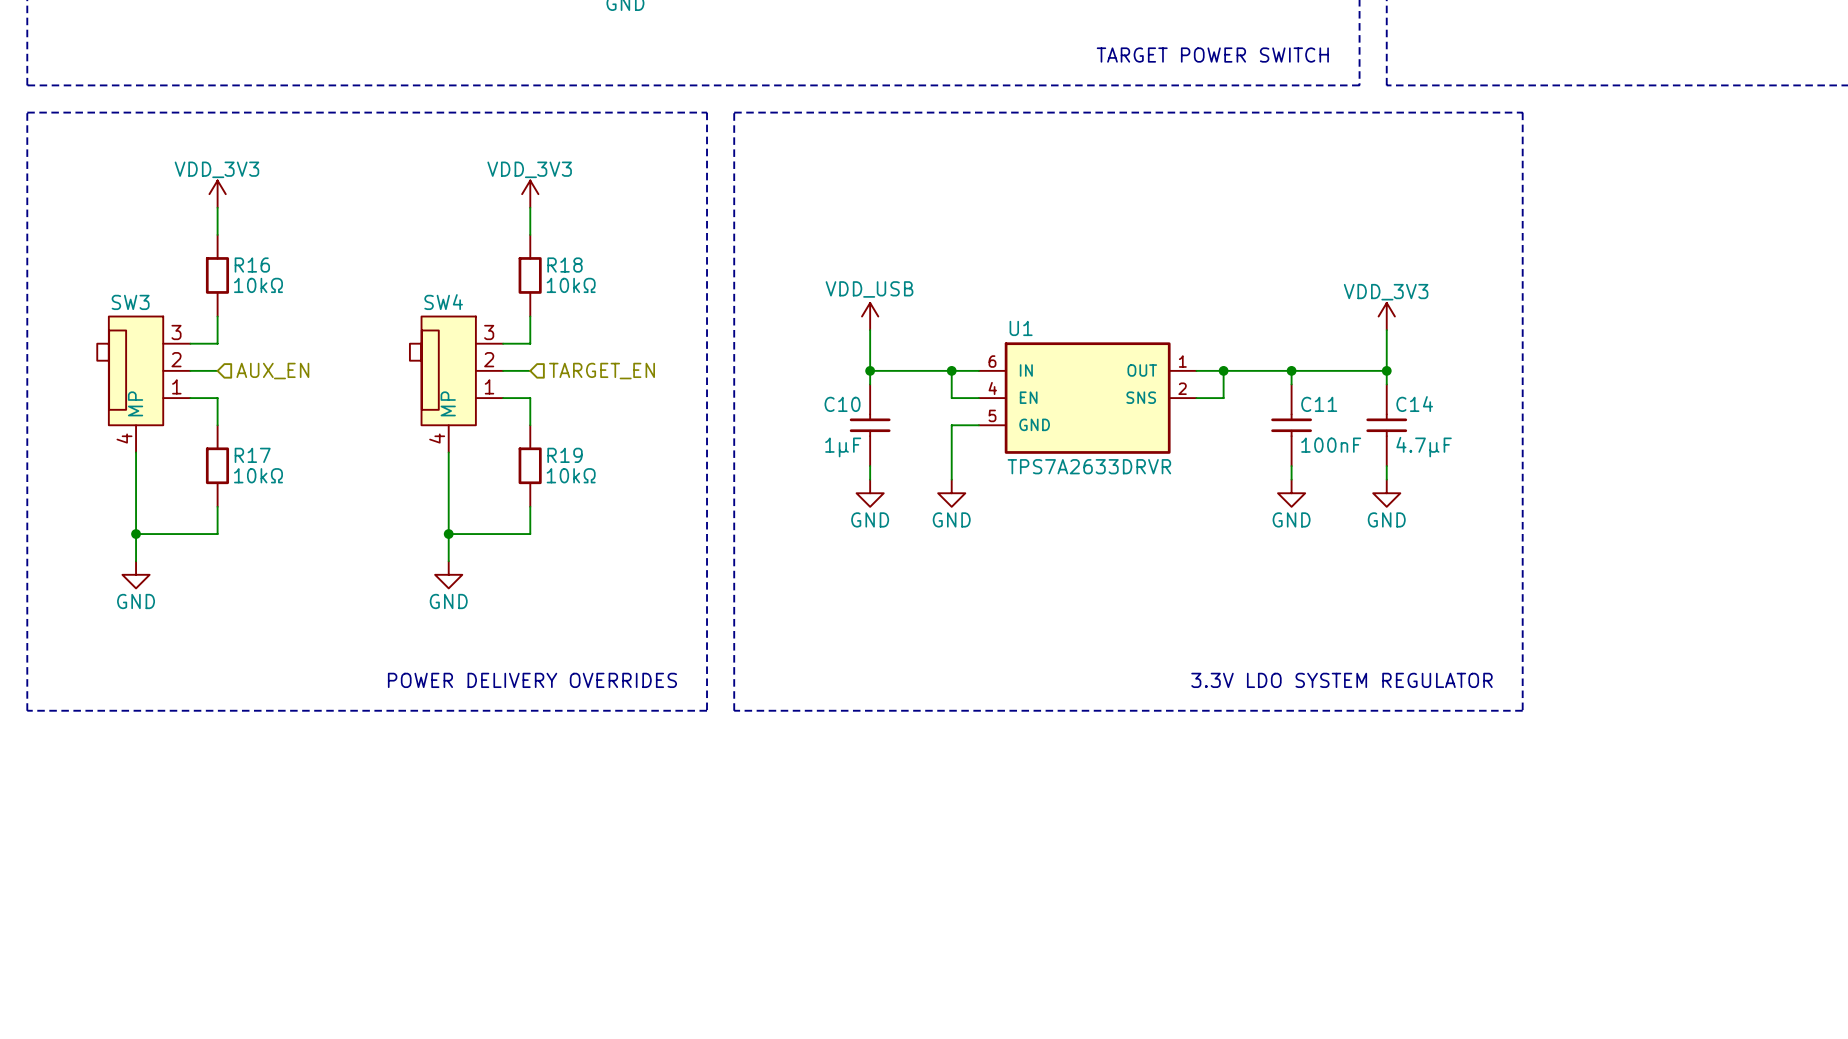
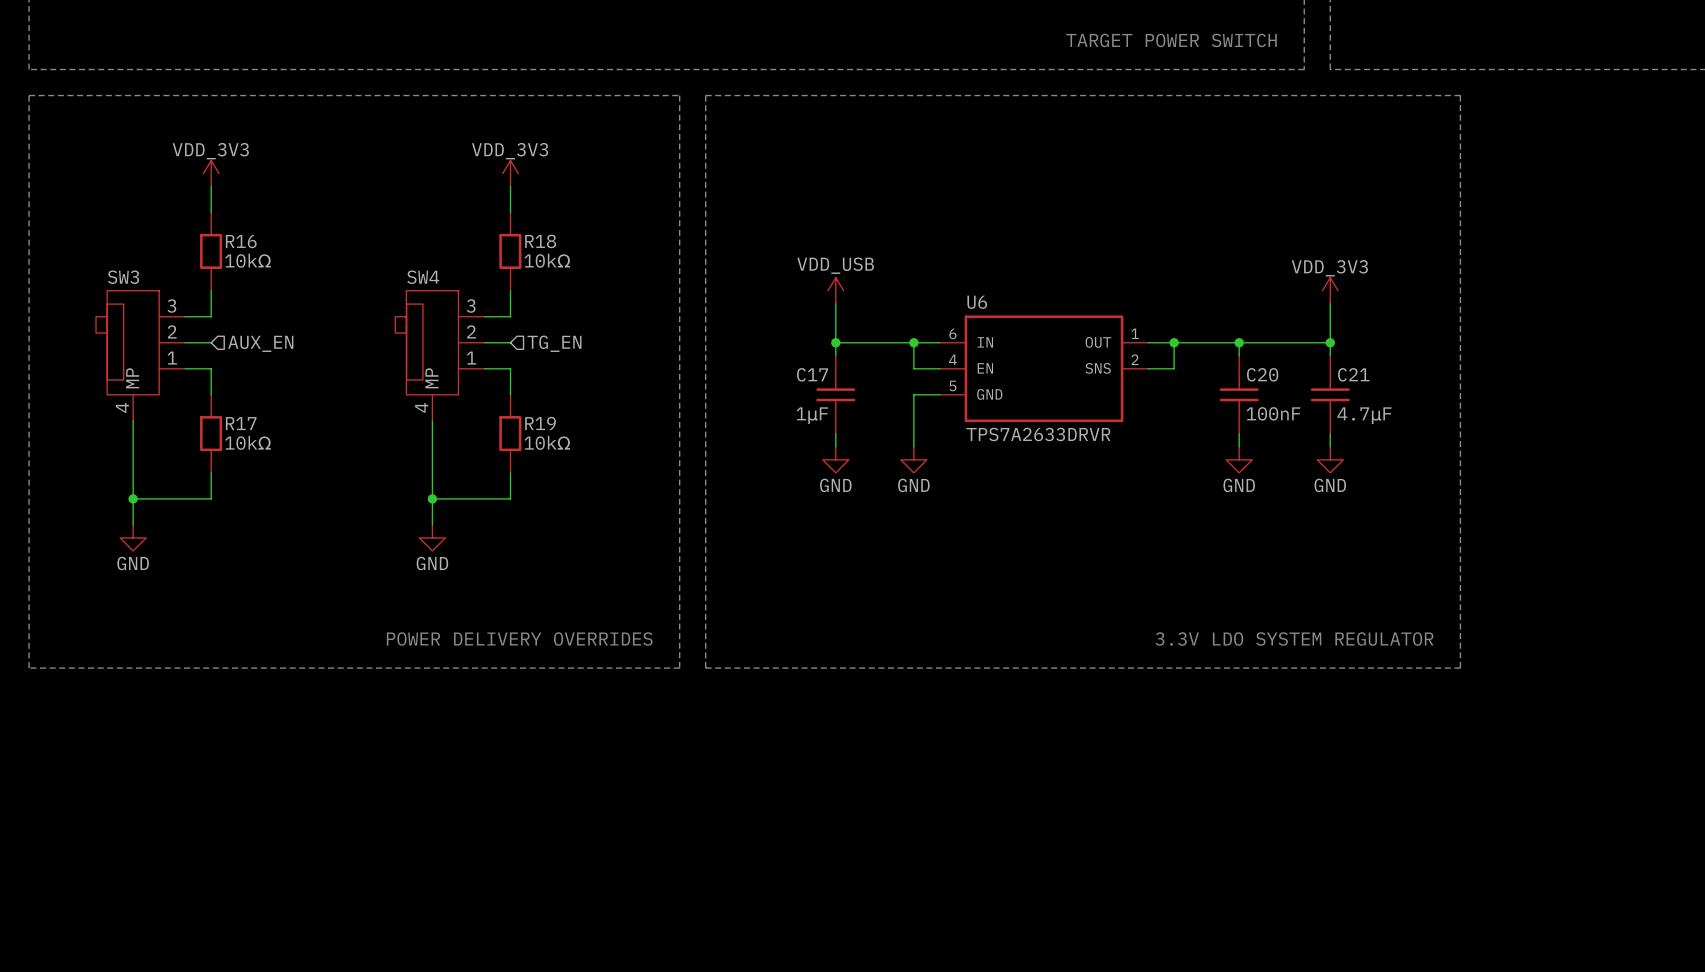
U1 name: U1 (1021, 328) -> U6 (977, 302)
hierarchical label: TARGET_EN (602, 371) -> TG_EN (554, 343)
C10 name: C10 (842, 404) -> C17 (812, 374)
C11 name: C11 (1319, 404) -> C20 (1262, 374)
C14 name: C14 (1414, 404) -> C21 (1353, 374)

